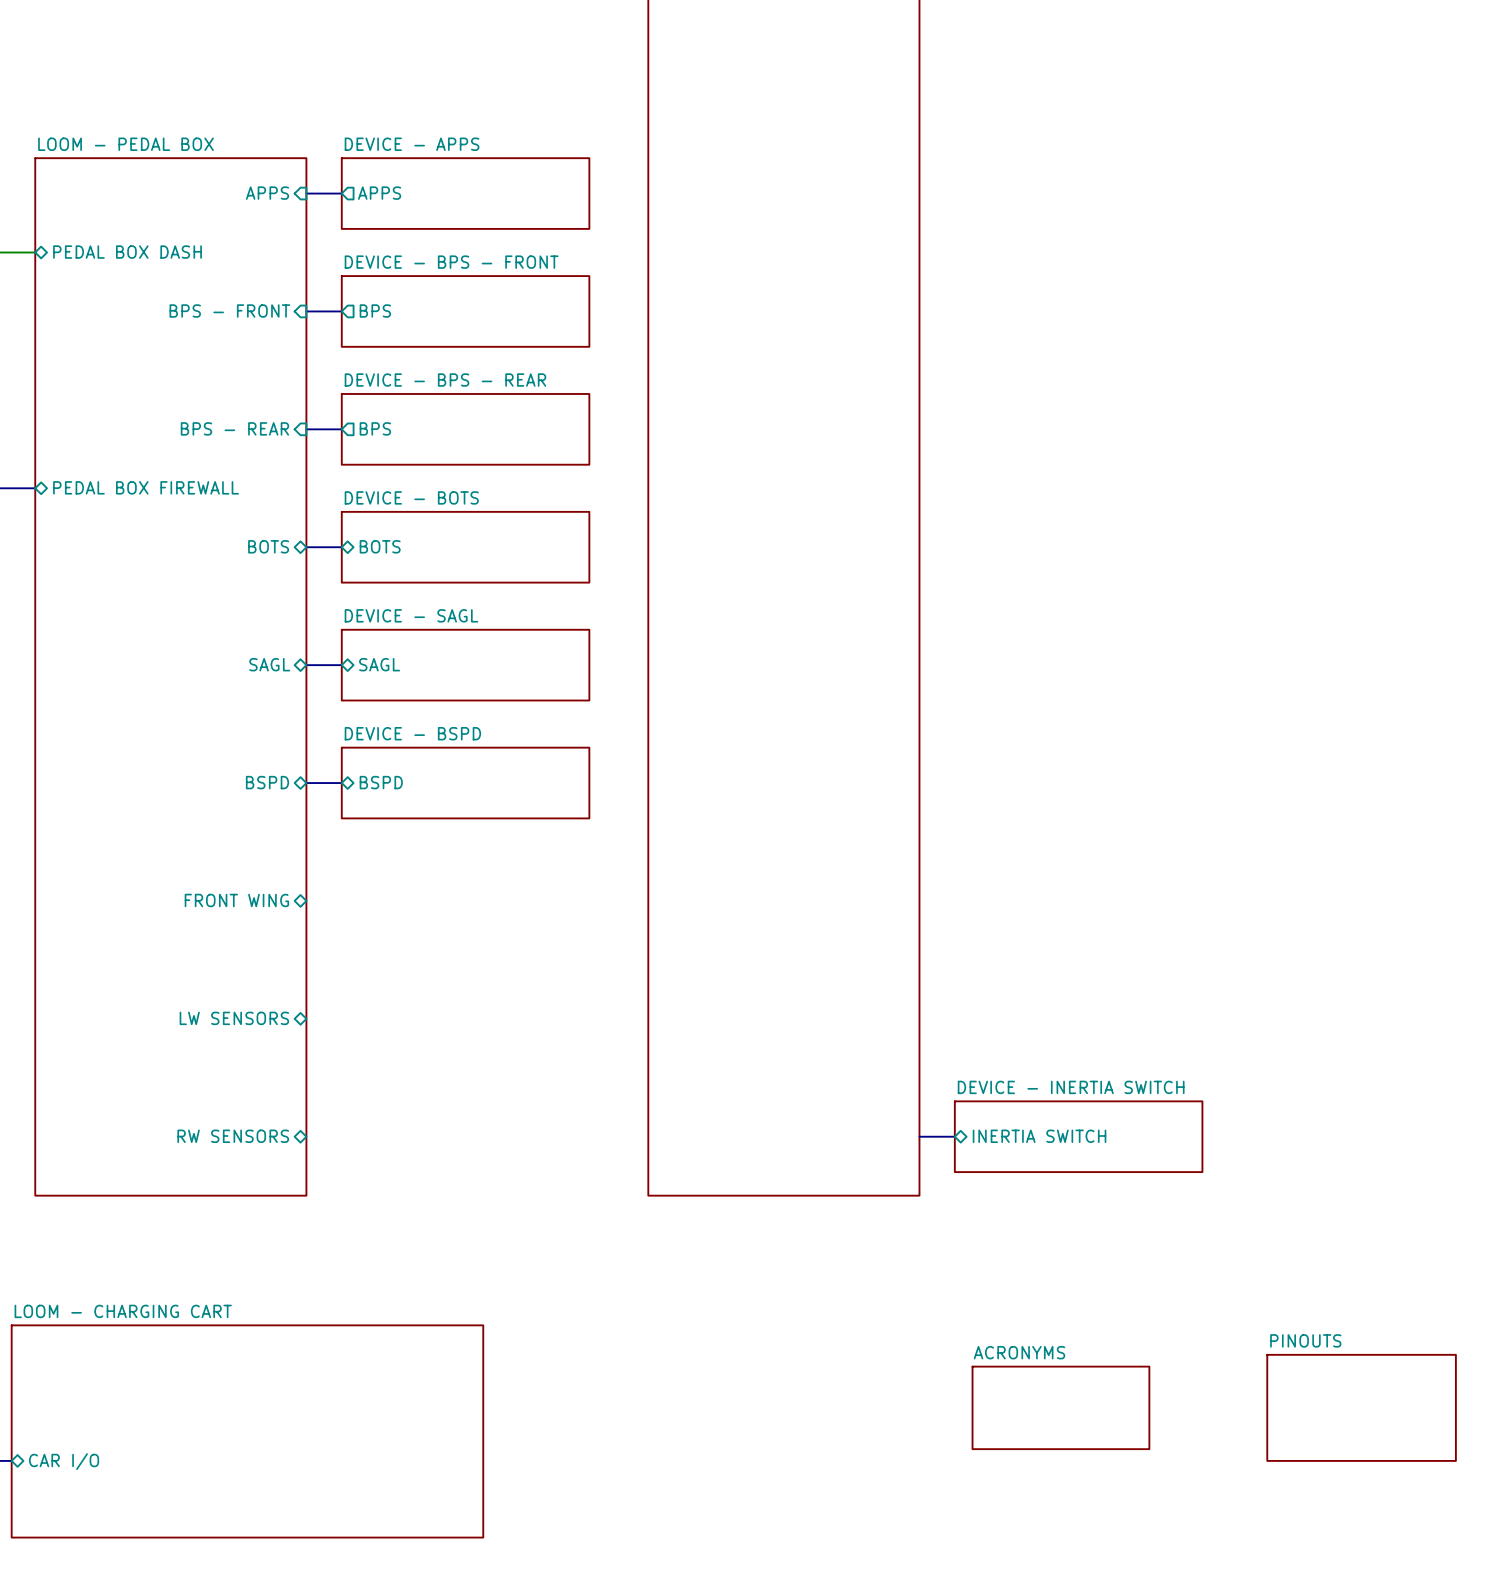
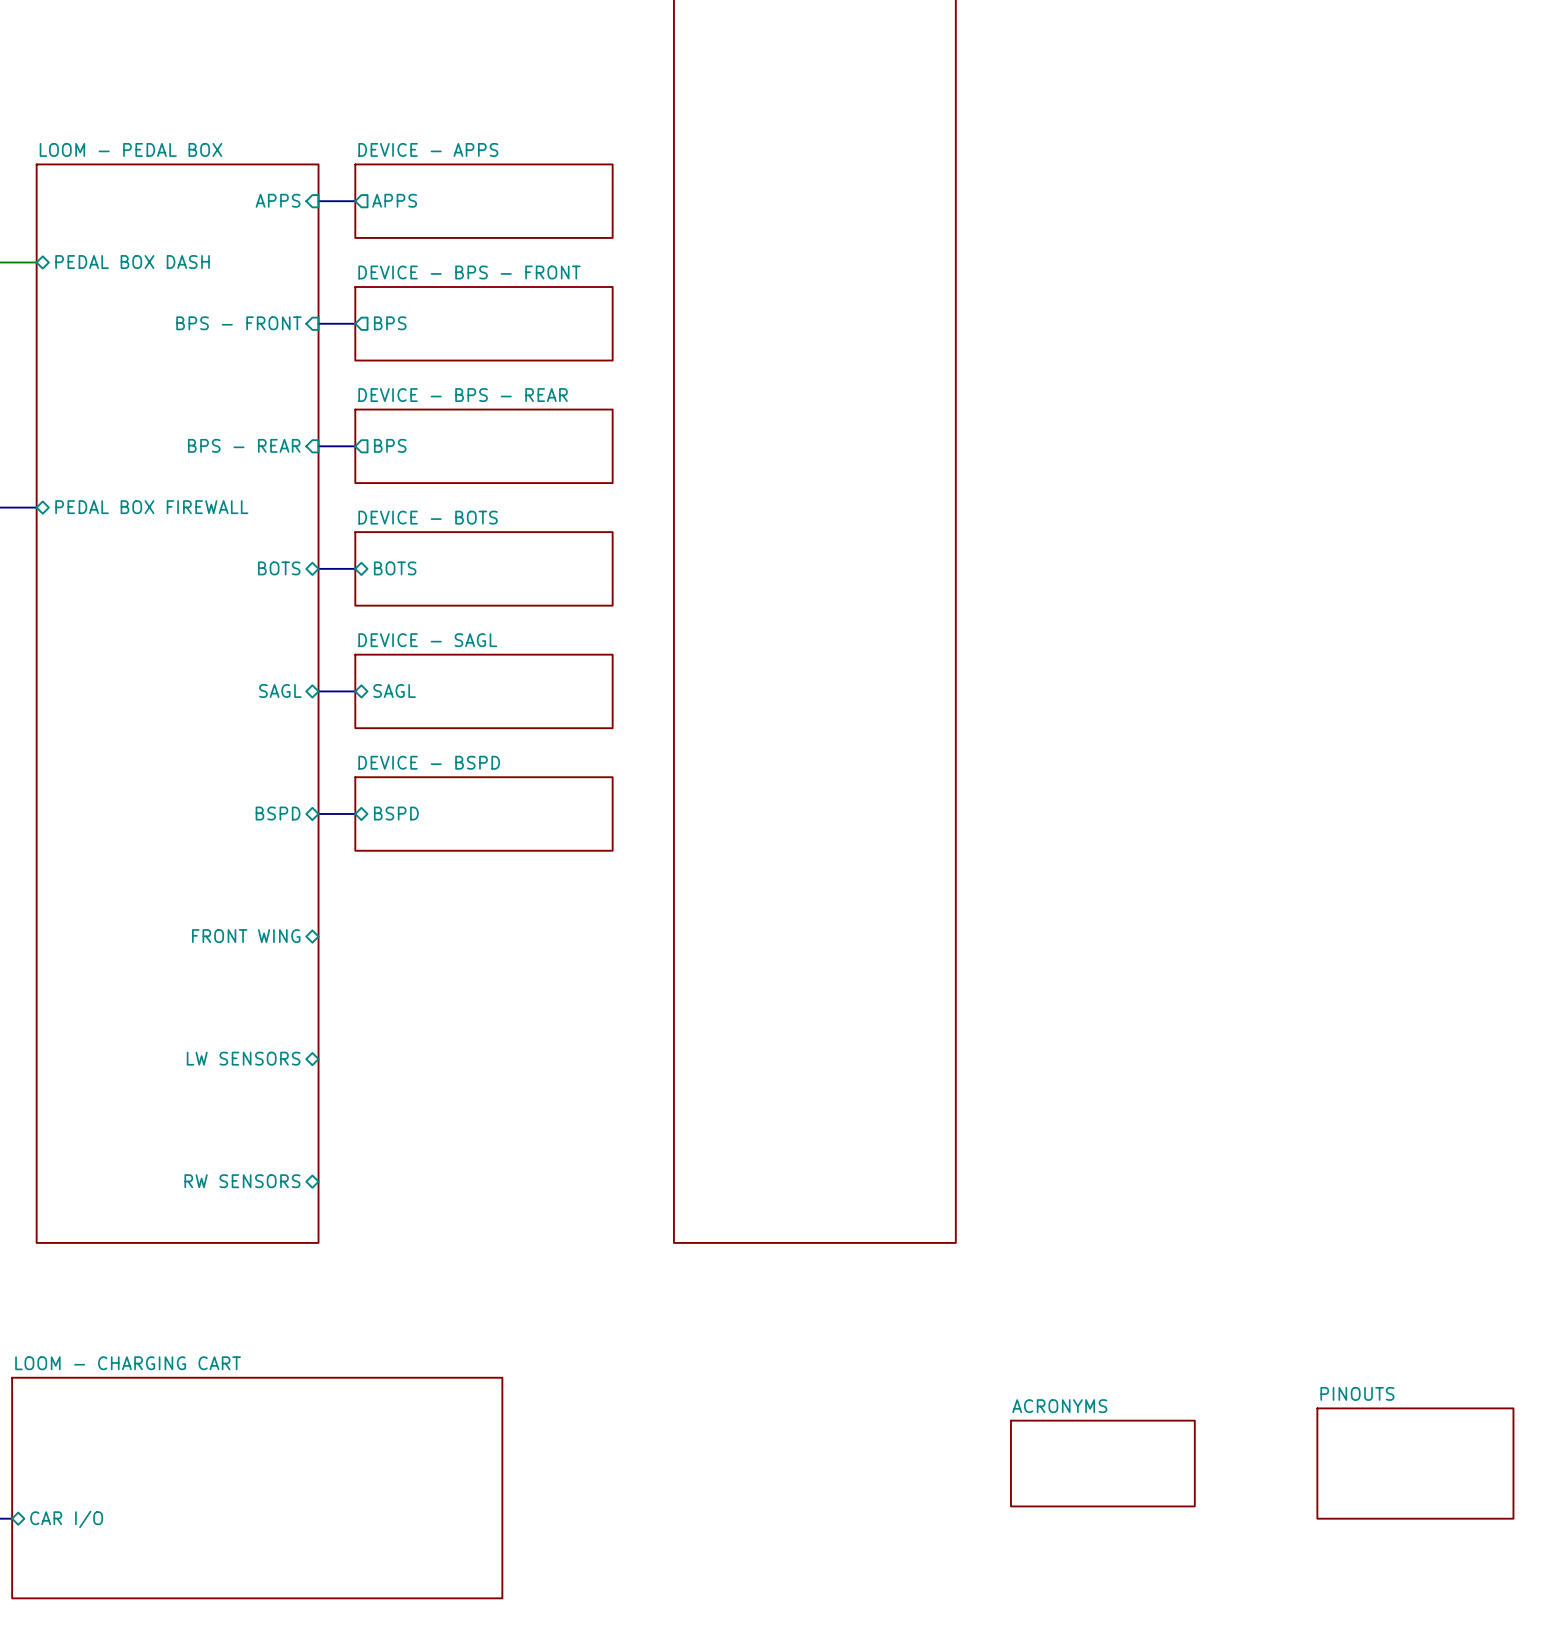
bus: (919, 1136) (954, 1136) -> none
sheet pin: INERTIA SWITCH (1039, 1136) -> none
sheet DEVICE - INERTIA SWITCH: (1078, 1136) -> none

